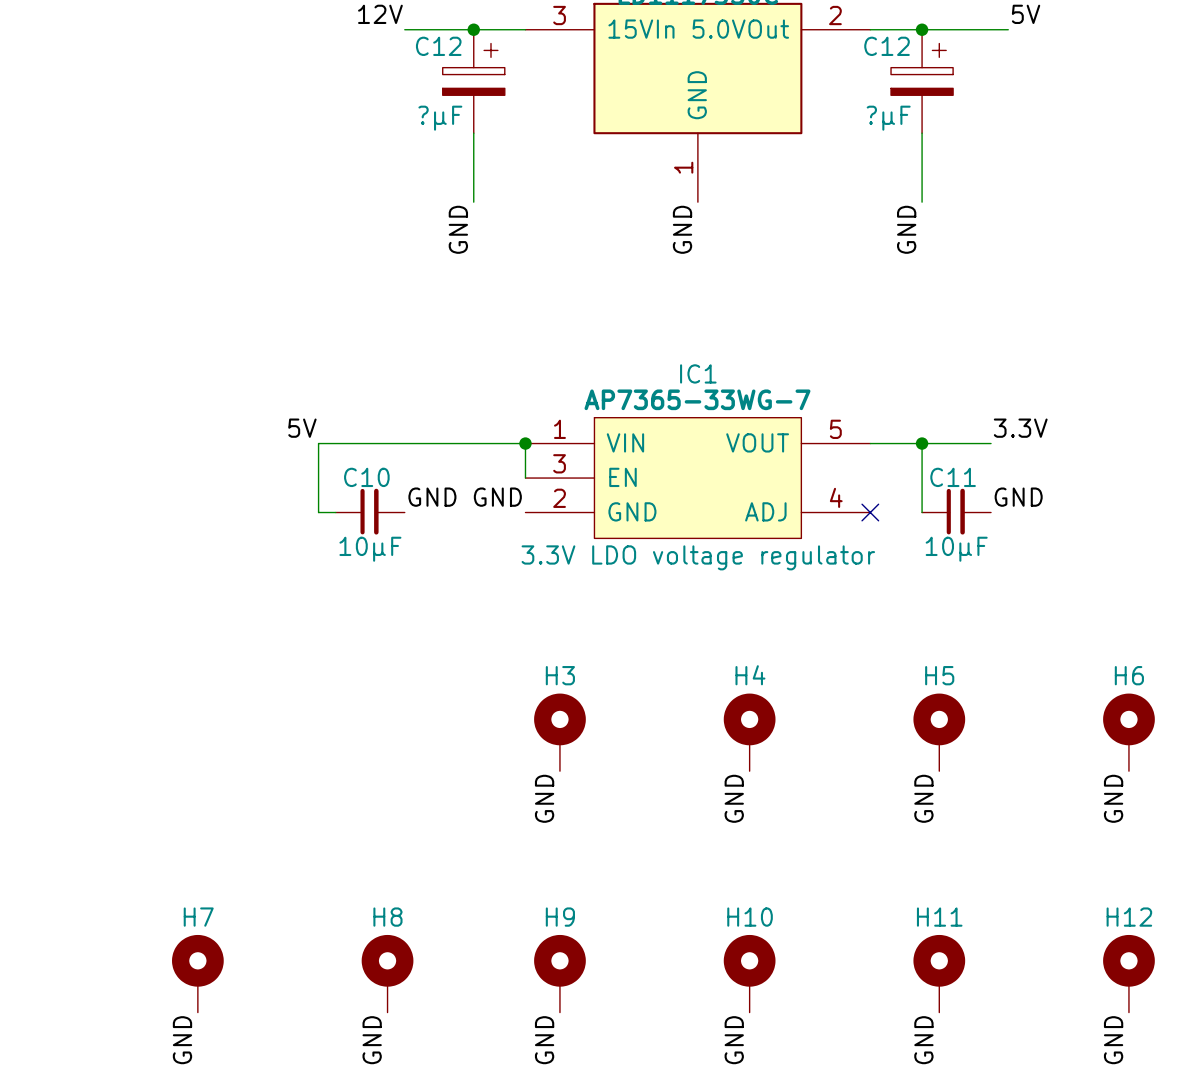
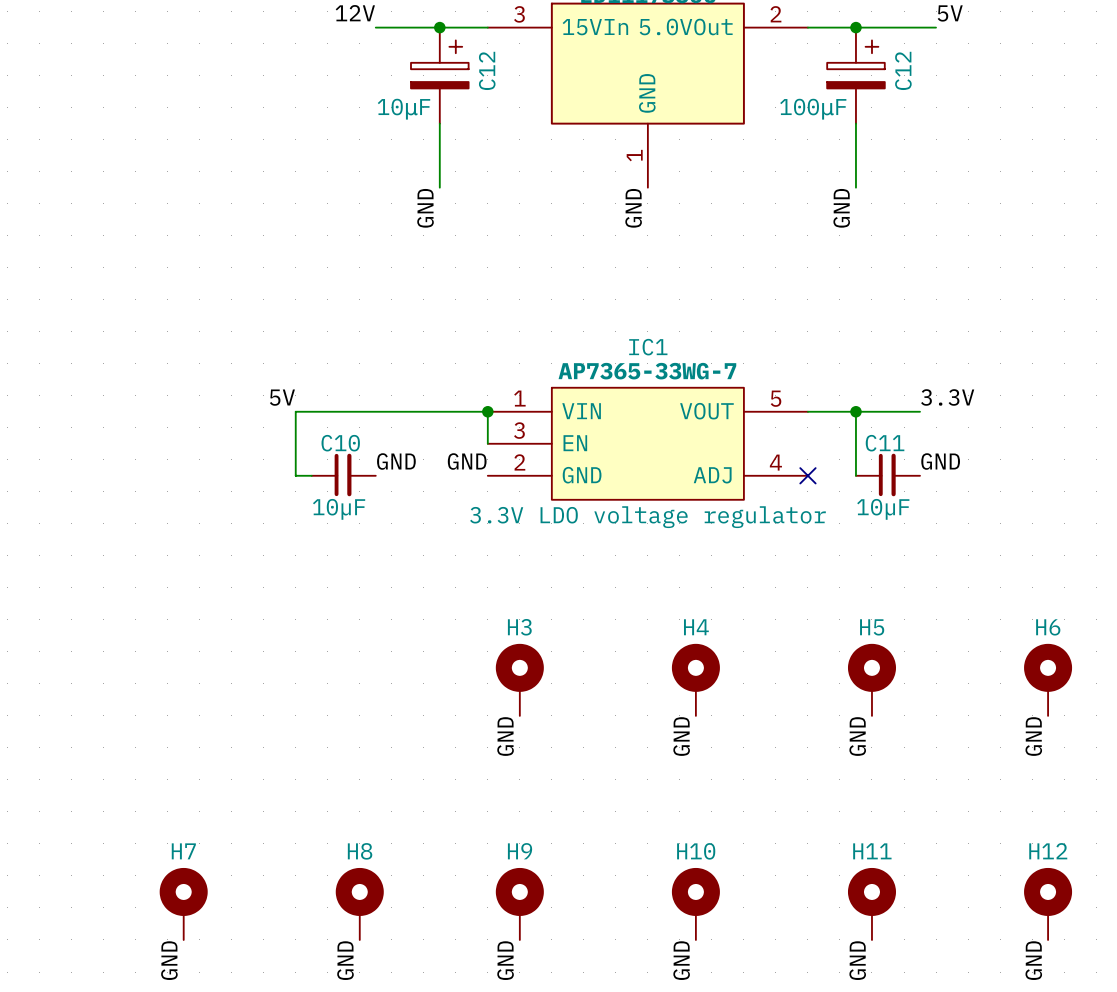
C12 name rotation: 0° (438, 46) -> 90° counterclockwise (487, 70)
C12 name position: C12 (438, 46) -> C12 (487, 70)
C12 name rotation: 0° (887, 46) -> 90° counterclockwise (903, 70)
C12 name position: C12 (887, 46) -> C12 (903, 70)
C12 text: ?μF (440, 118) -> 10μF (403, 109)
C12 text: ?μF (888, 118) -> 100μF (813, 109)

